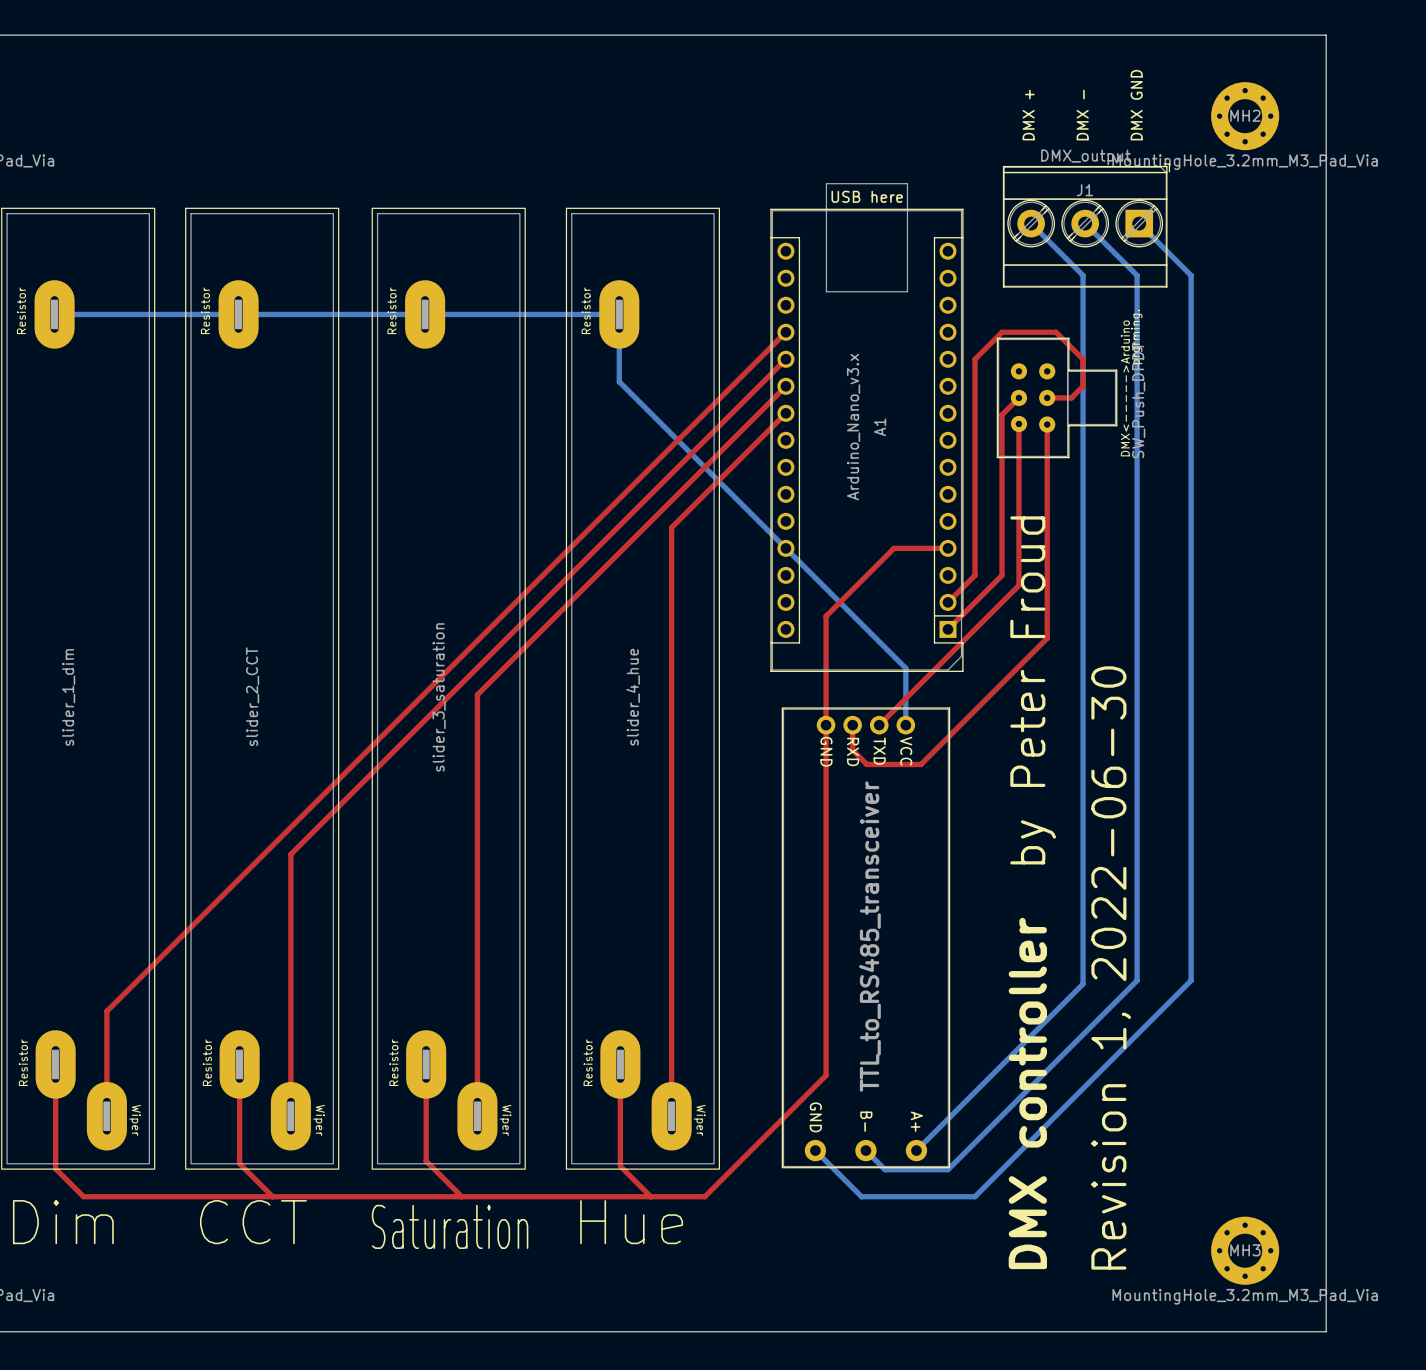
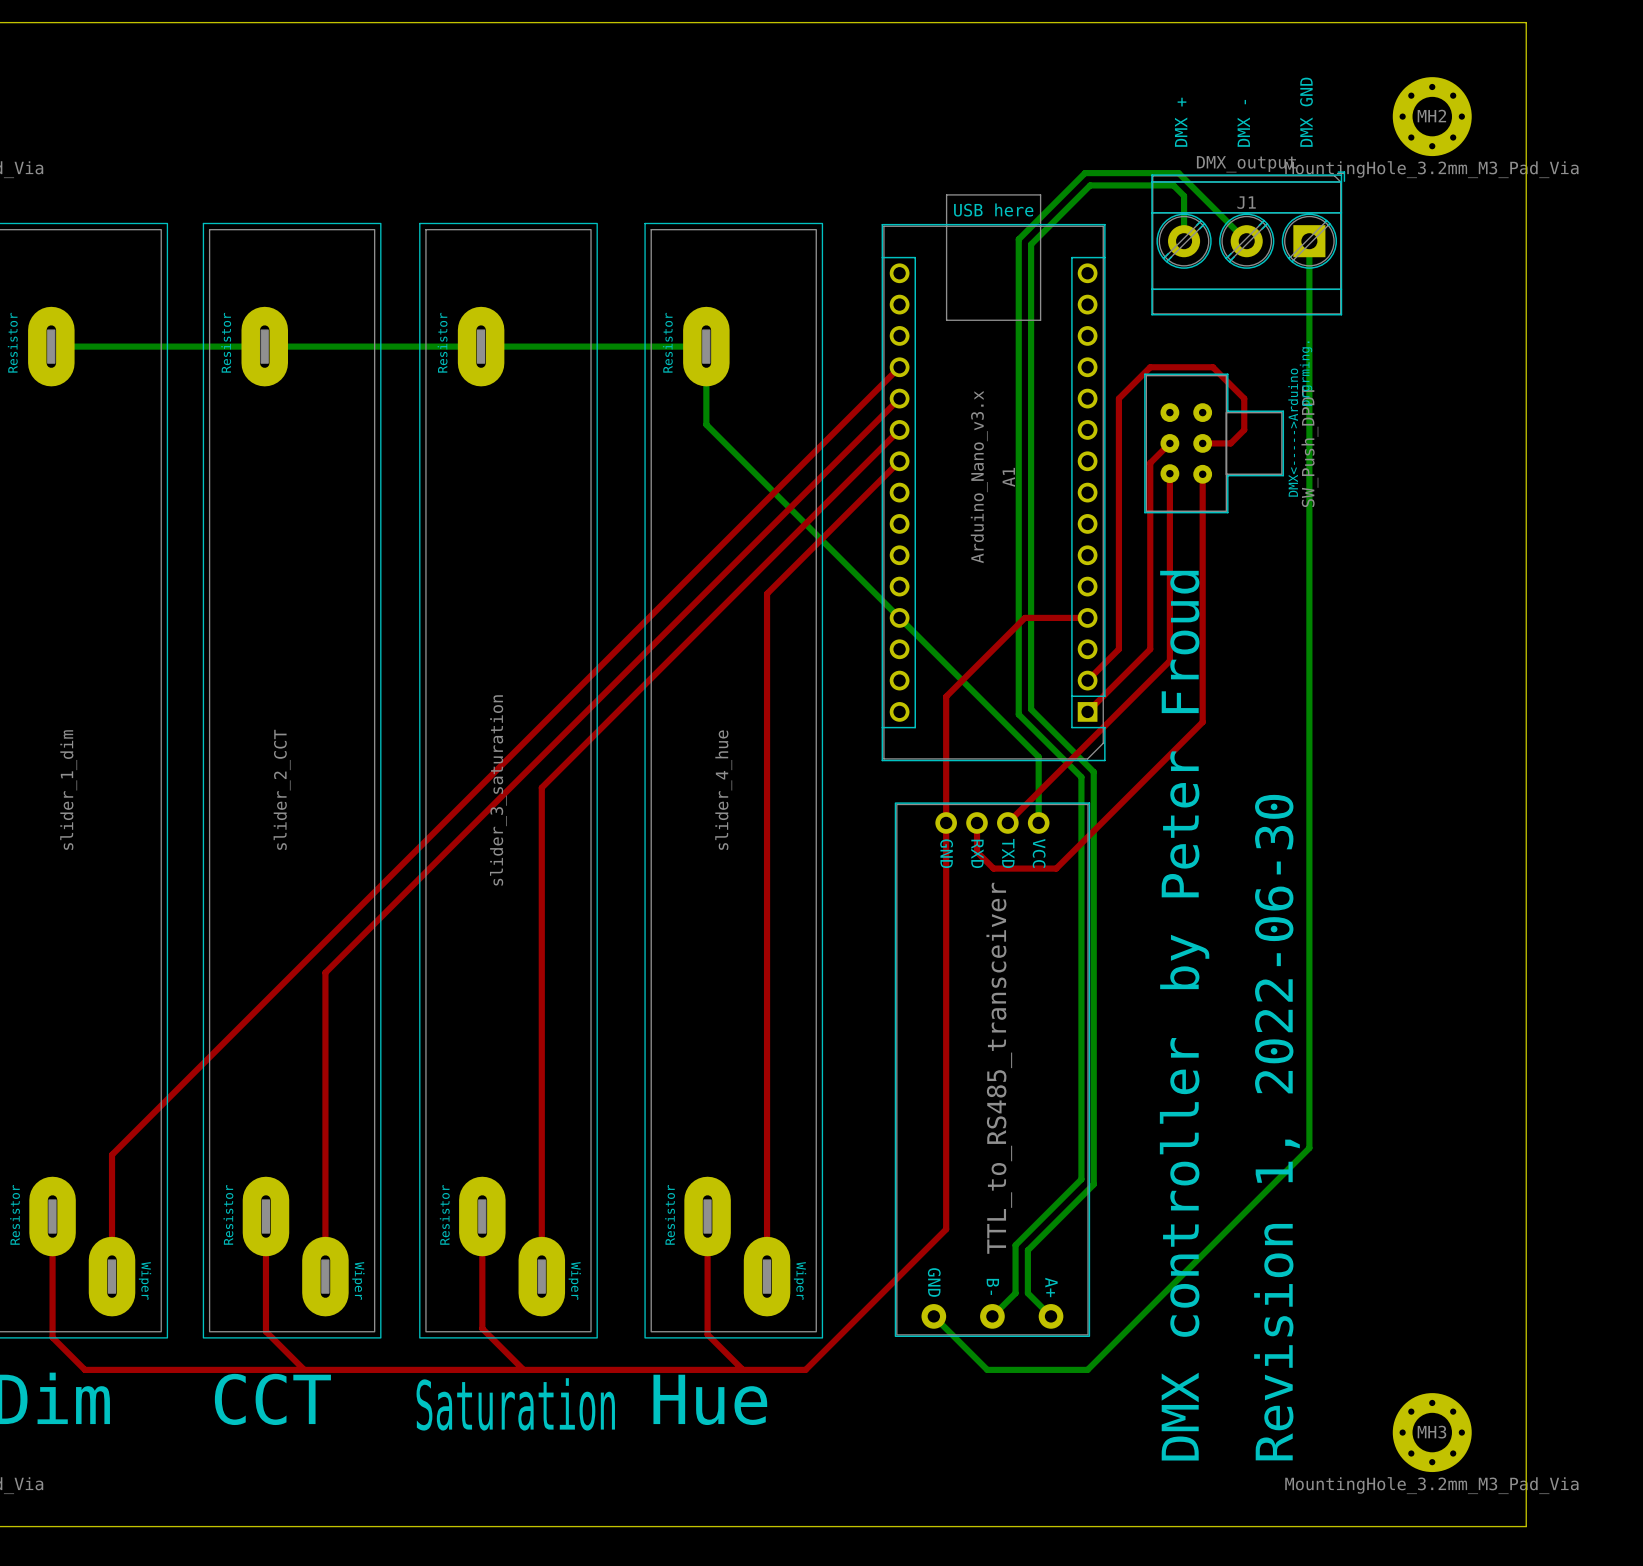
bottom track: (1031, 223) (1083, 275) (1083, 983) (916, 1150) -> (1184, 241) (1184, 195) (1173, 185) (1090, 185) (1031, 244) (1031, 709) (1093, 772) (1093, 1184) (1027, 1250) (1027, 1293) (1051, 1316)
bottom track: (1085, 223) (1137, 275) (1137, 980) (948, 1169) (885, 1169) (865, 1150) -> (1246, 241) (1178, 173) (1085, 173) (1018, 239) (1018, 714) (1081, 777) (1081, 1179) (1015, 1245) (1015, 1293) (992, 1316)
bottom track: (1139, 223) (1191, 275) (1191, 980) (975, 1196) (948, 1196) -> (1309, 241) (1309, 1148) (1087, 1369)

